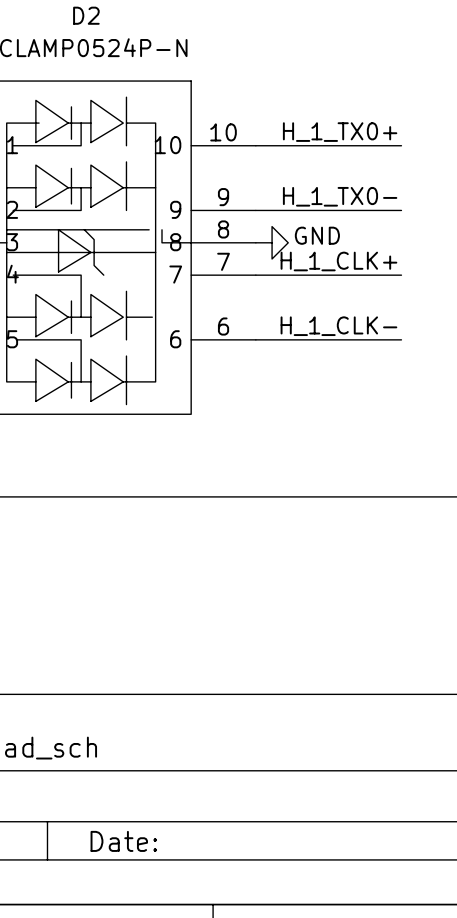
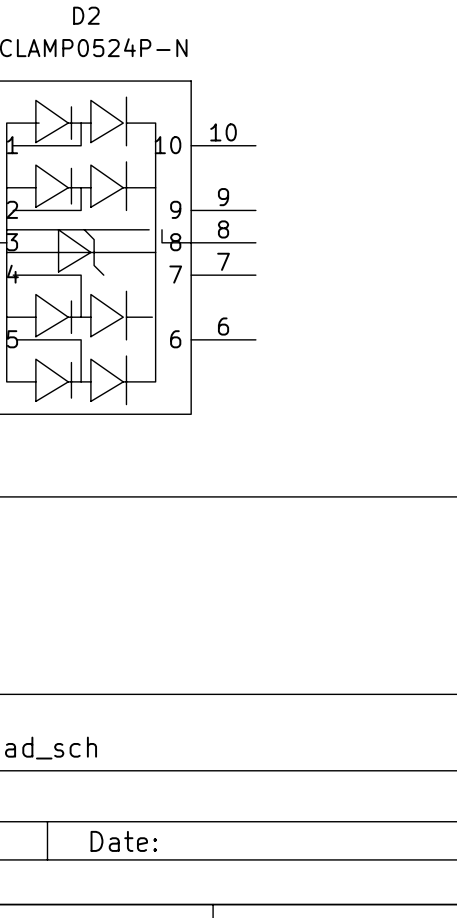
label: H_1_TX0+ (340, 132) -> none
wire: (255, 145) (401, 145) -> none
label: H_1_TX0- (340, 196) -> none
wire: (255, 210) (401, 210) -> none
power symbol: GND (272, 242) -> none
label: H_1_CLK+ (338, 261) -> none
wire: (255, 275) (401, 275) -> none
label: H_1_CLK- (338, 326) -> none
wire: (255, 339) (401, 339) -> none

